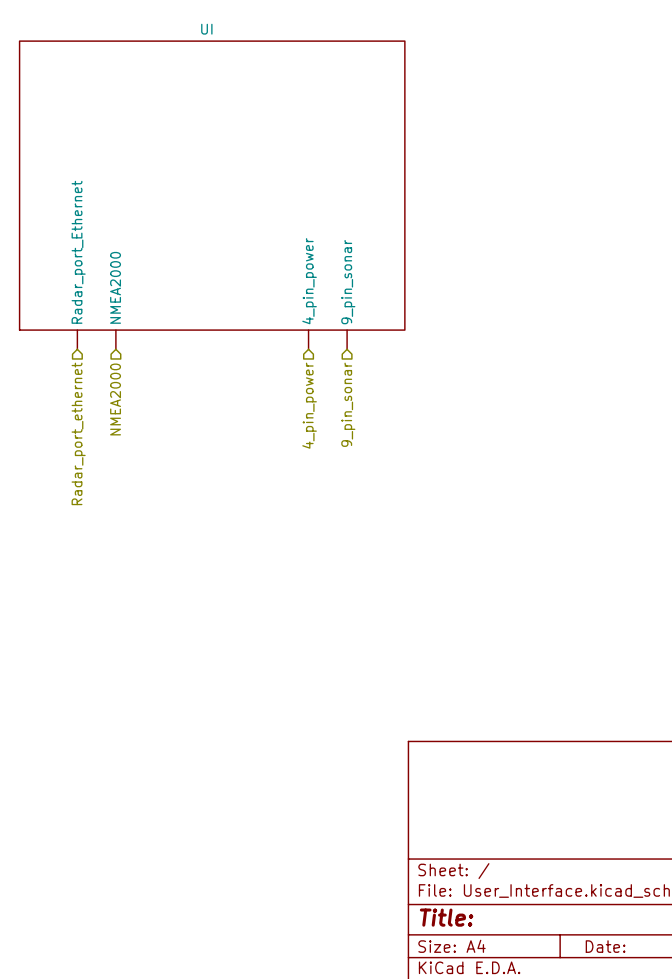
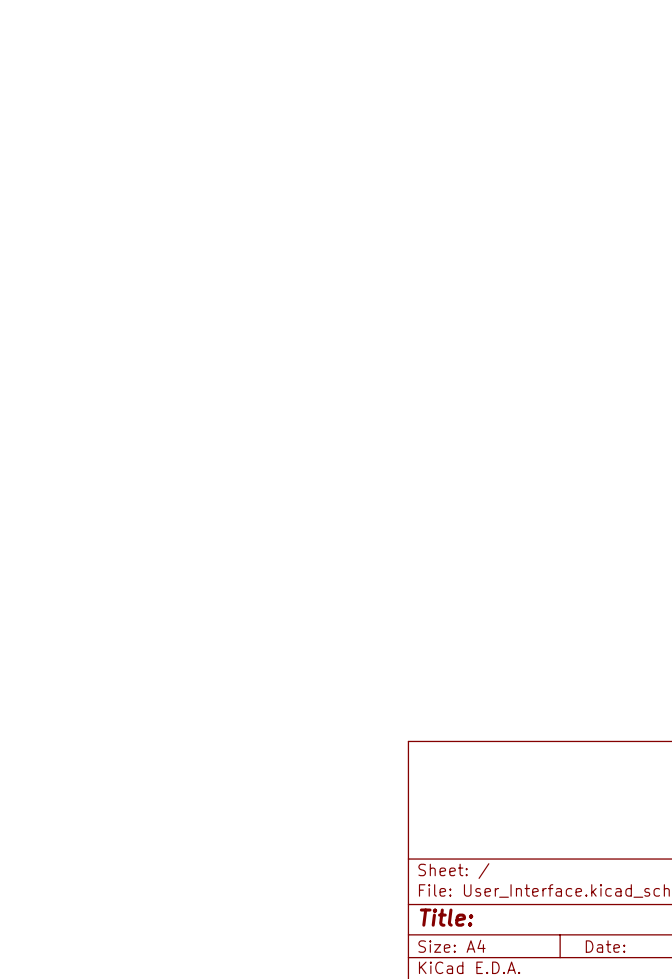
UI: (212, 195) -> none
hierarchical label: NMEA2000 (115, 399) -> none
hierarchical label: 9_pin_sonar (348, 404) -> none
hierarchical label: 4_pin_power (309, 405) -> none
hierarchical label: Radar_port_ethernet (78, 433) -> none

